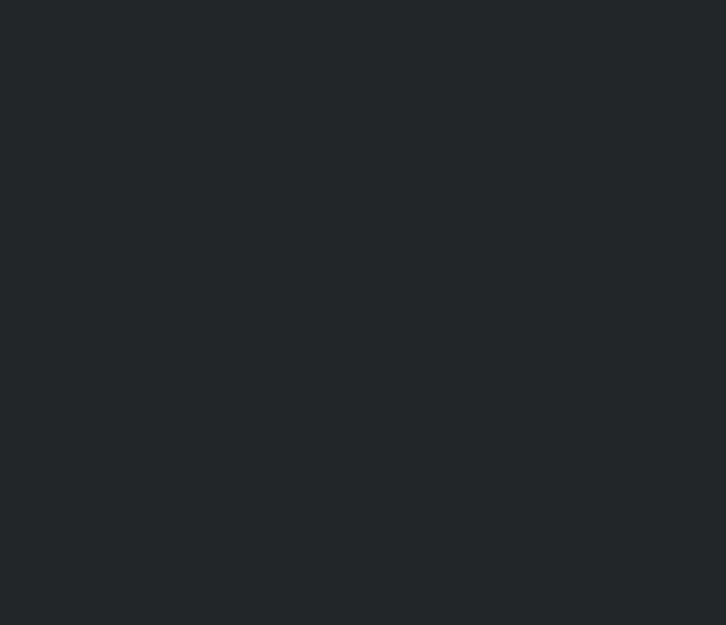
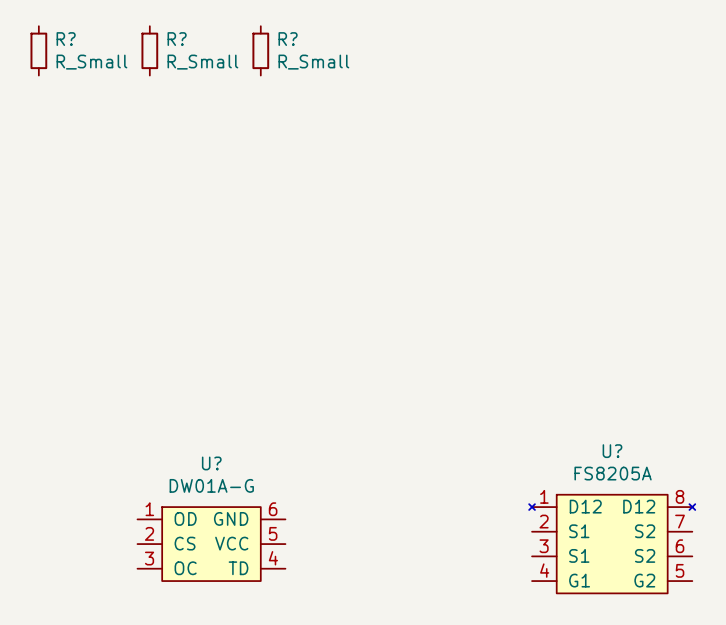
R?: none -> R_Small (38, 50)
R?: none -> R_Small (149, 50)
R?: none -> R_Small (260, 50)
U?: none -> DW01A-G (211, 544)
U?: none -> FS8205A (612, 544)

